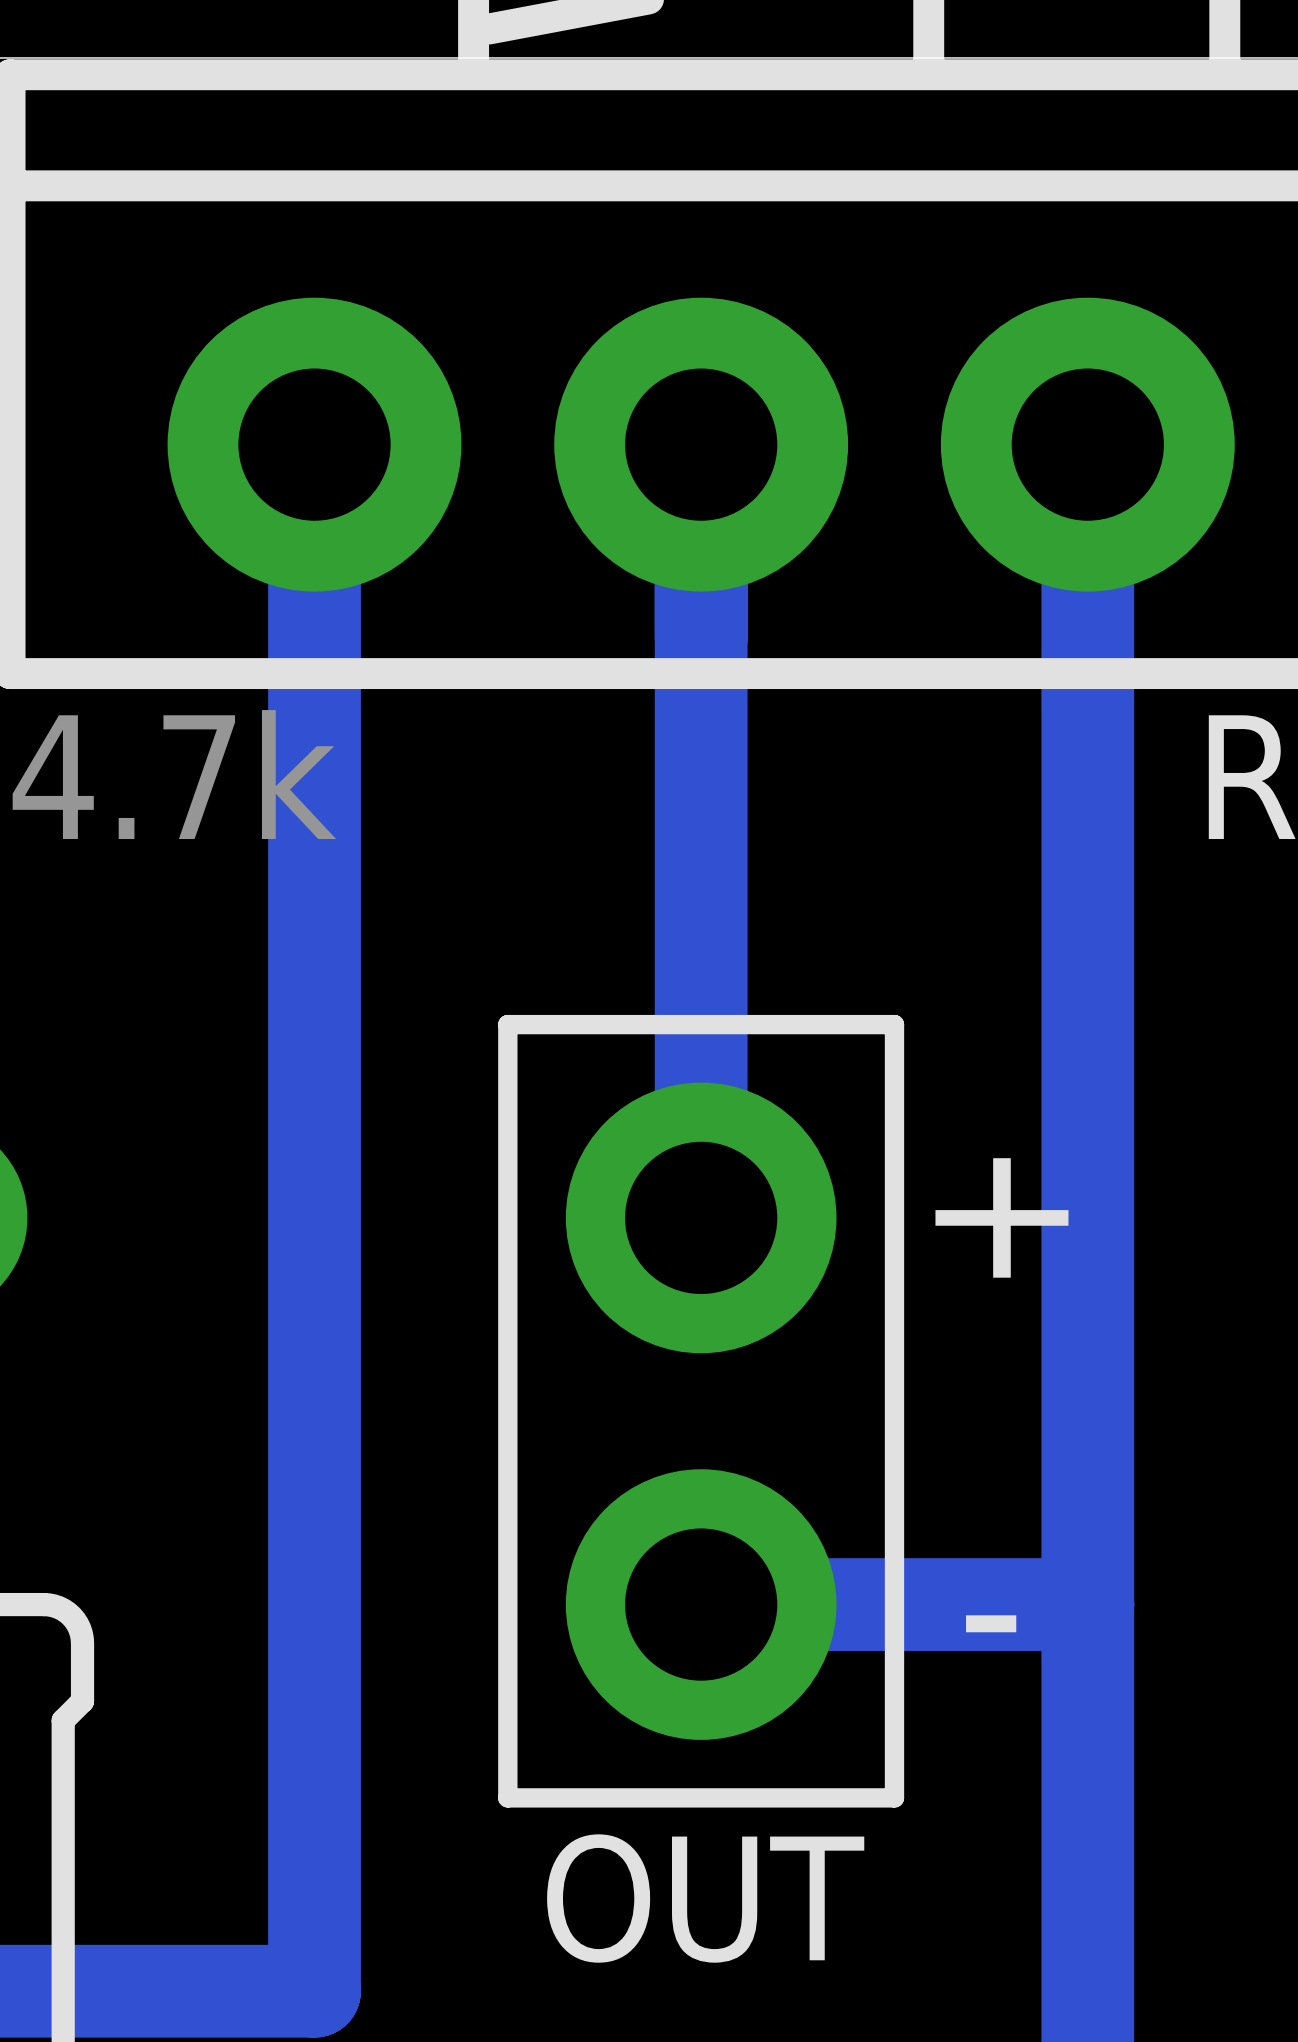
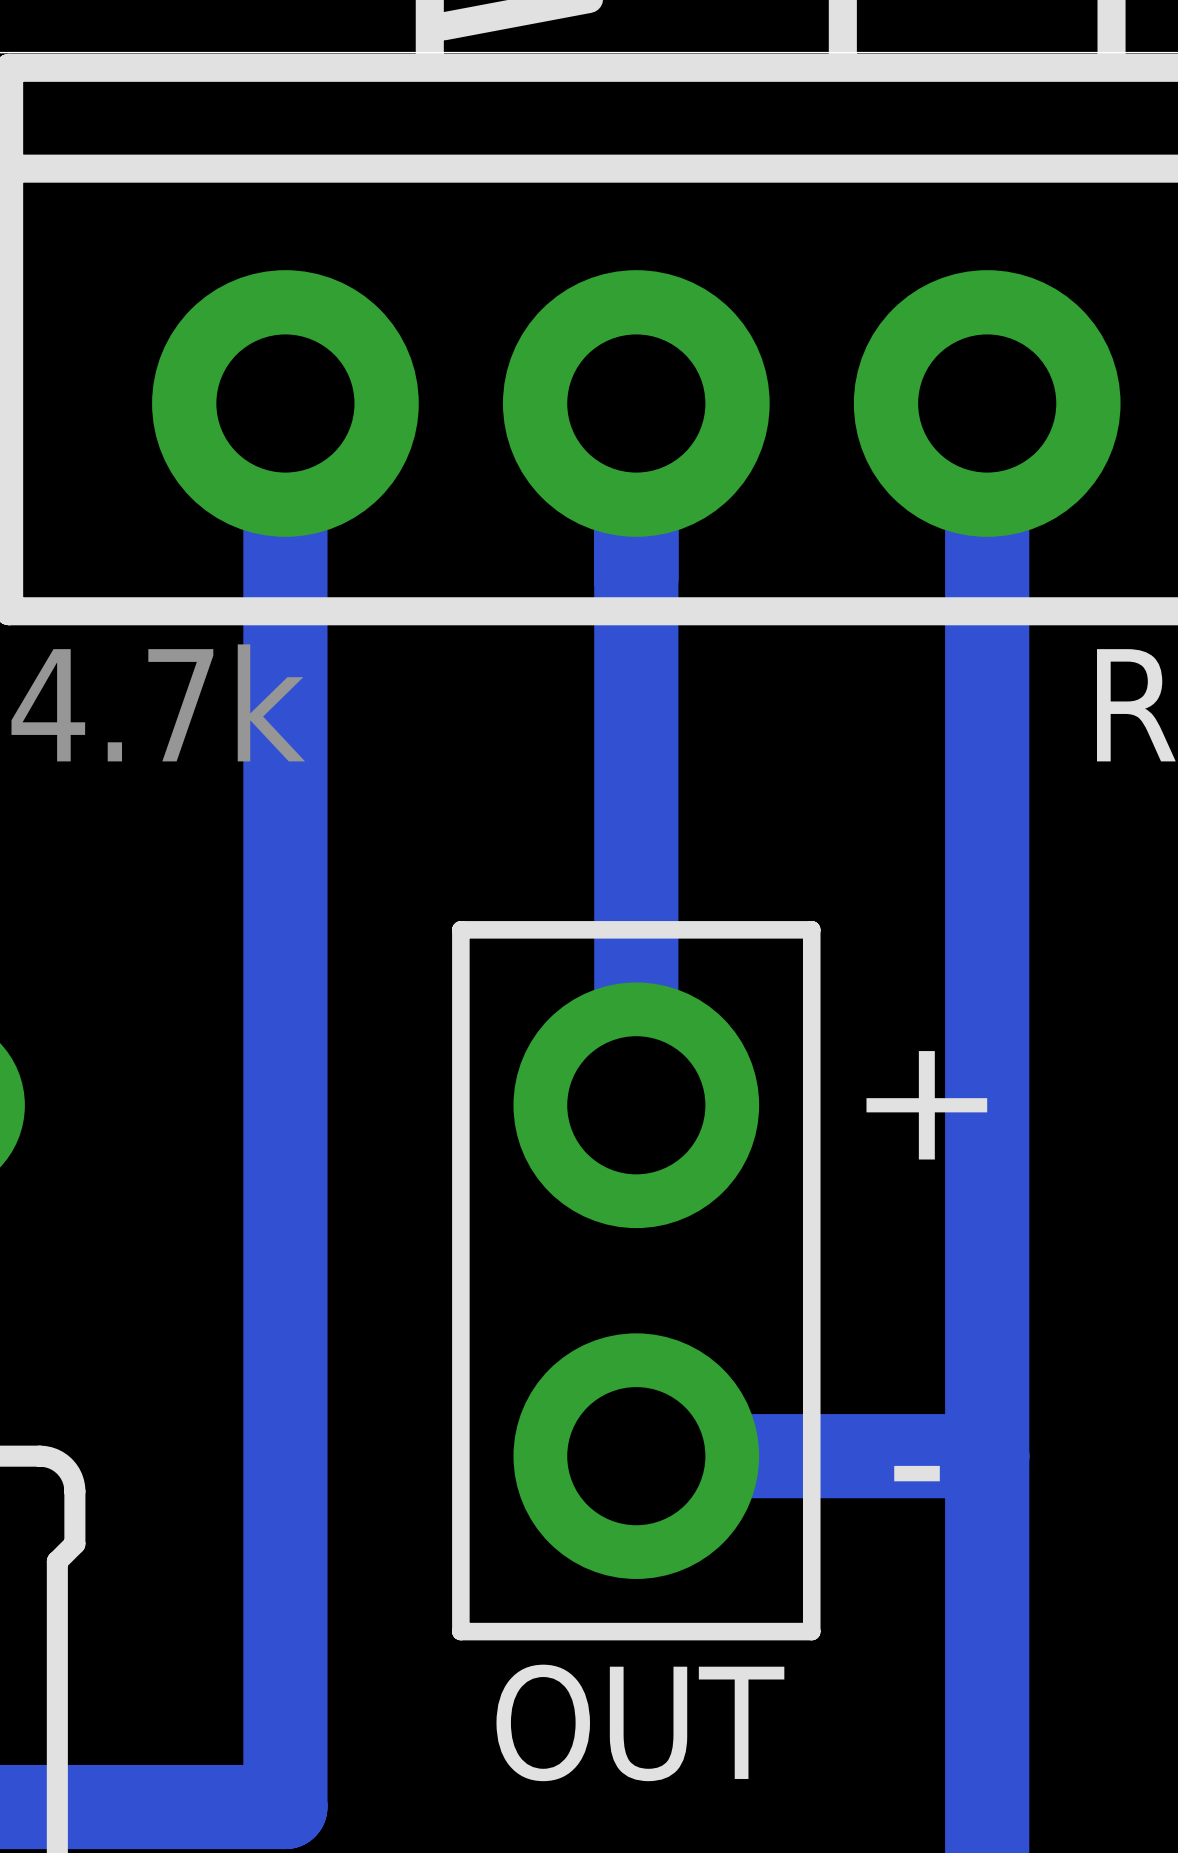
OUT text position: + (1001, 1217) -> + (926, 1105)
OUT text position: - (991, 1623) -> - (917, 1473)

